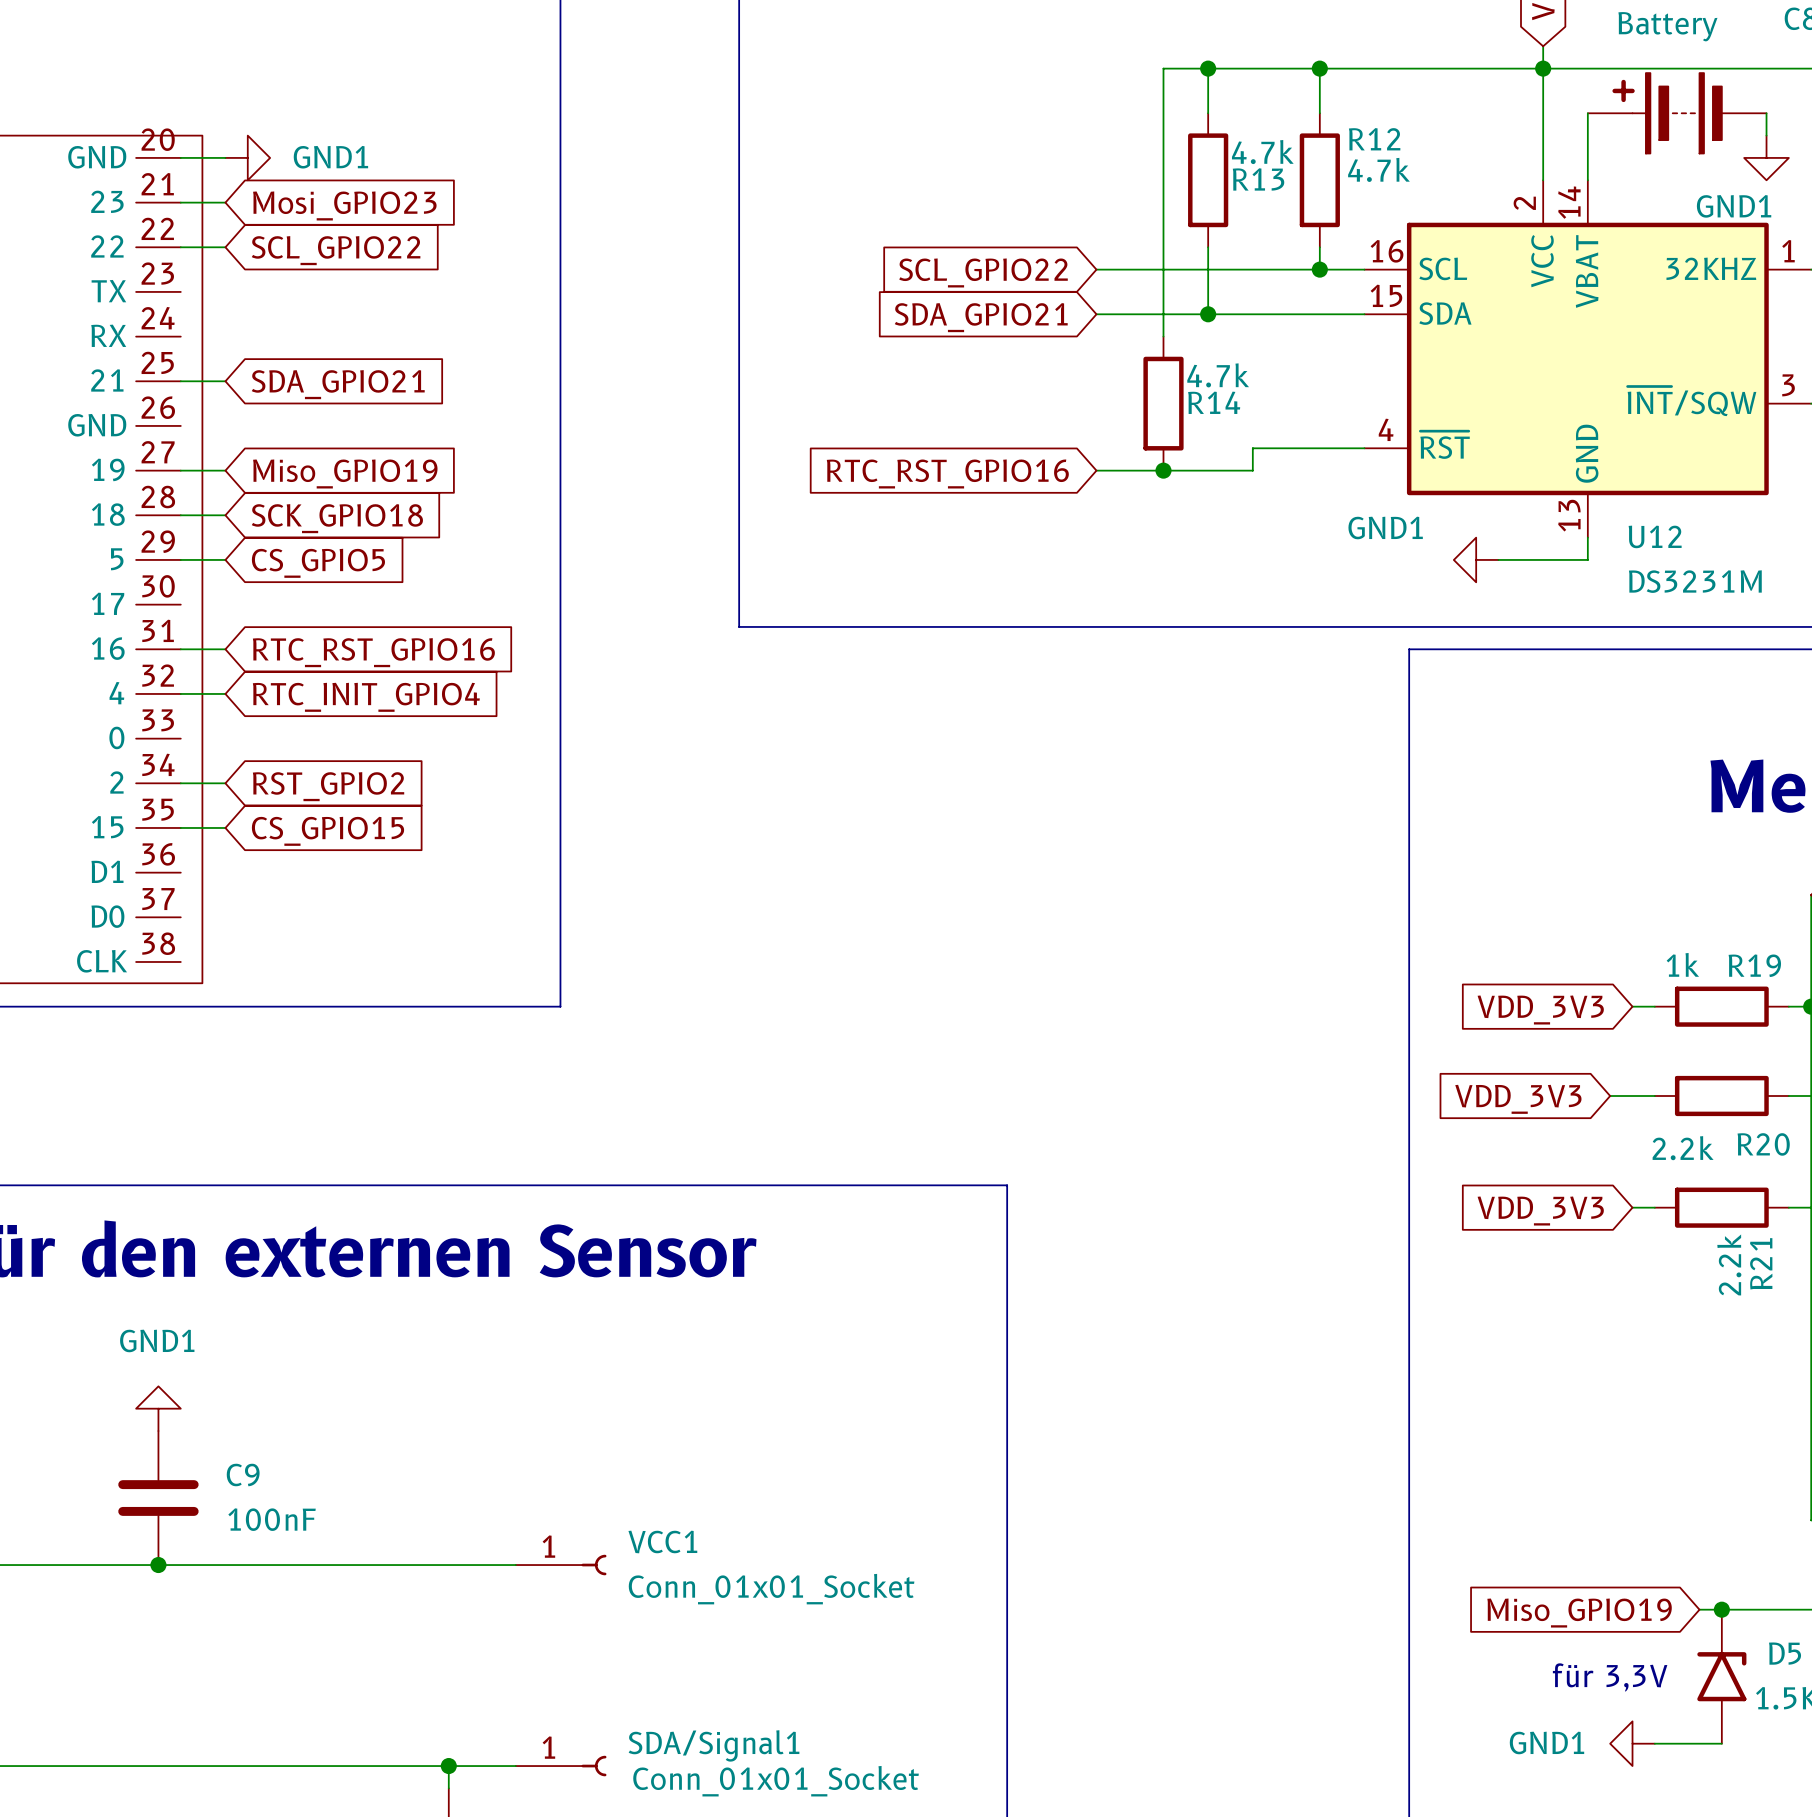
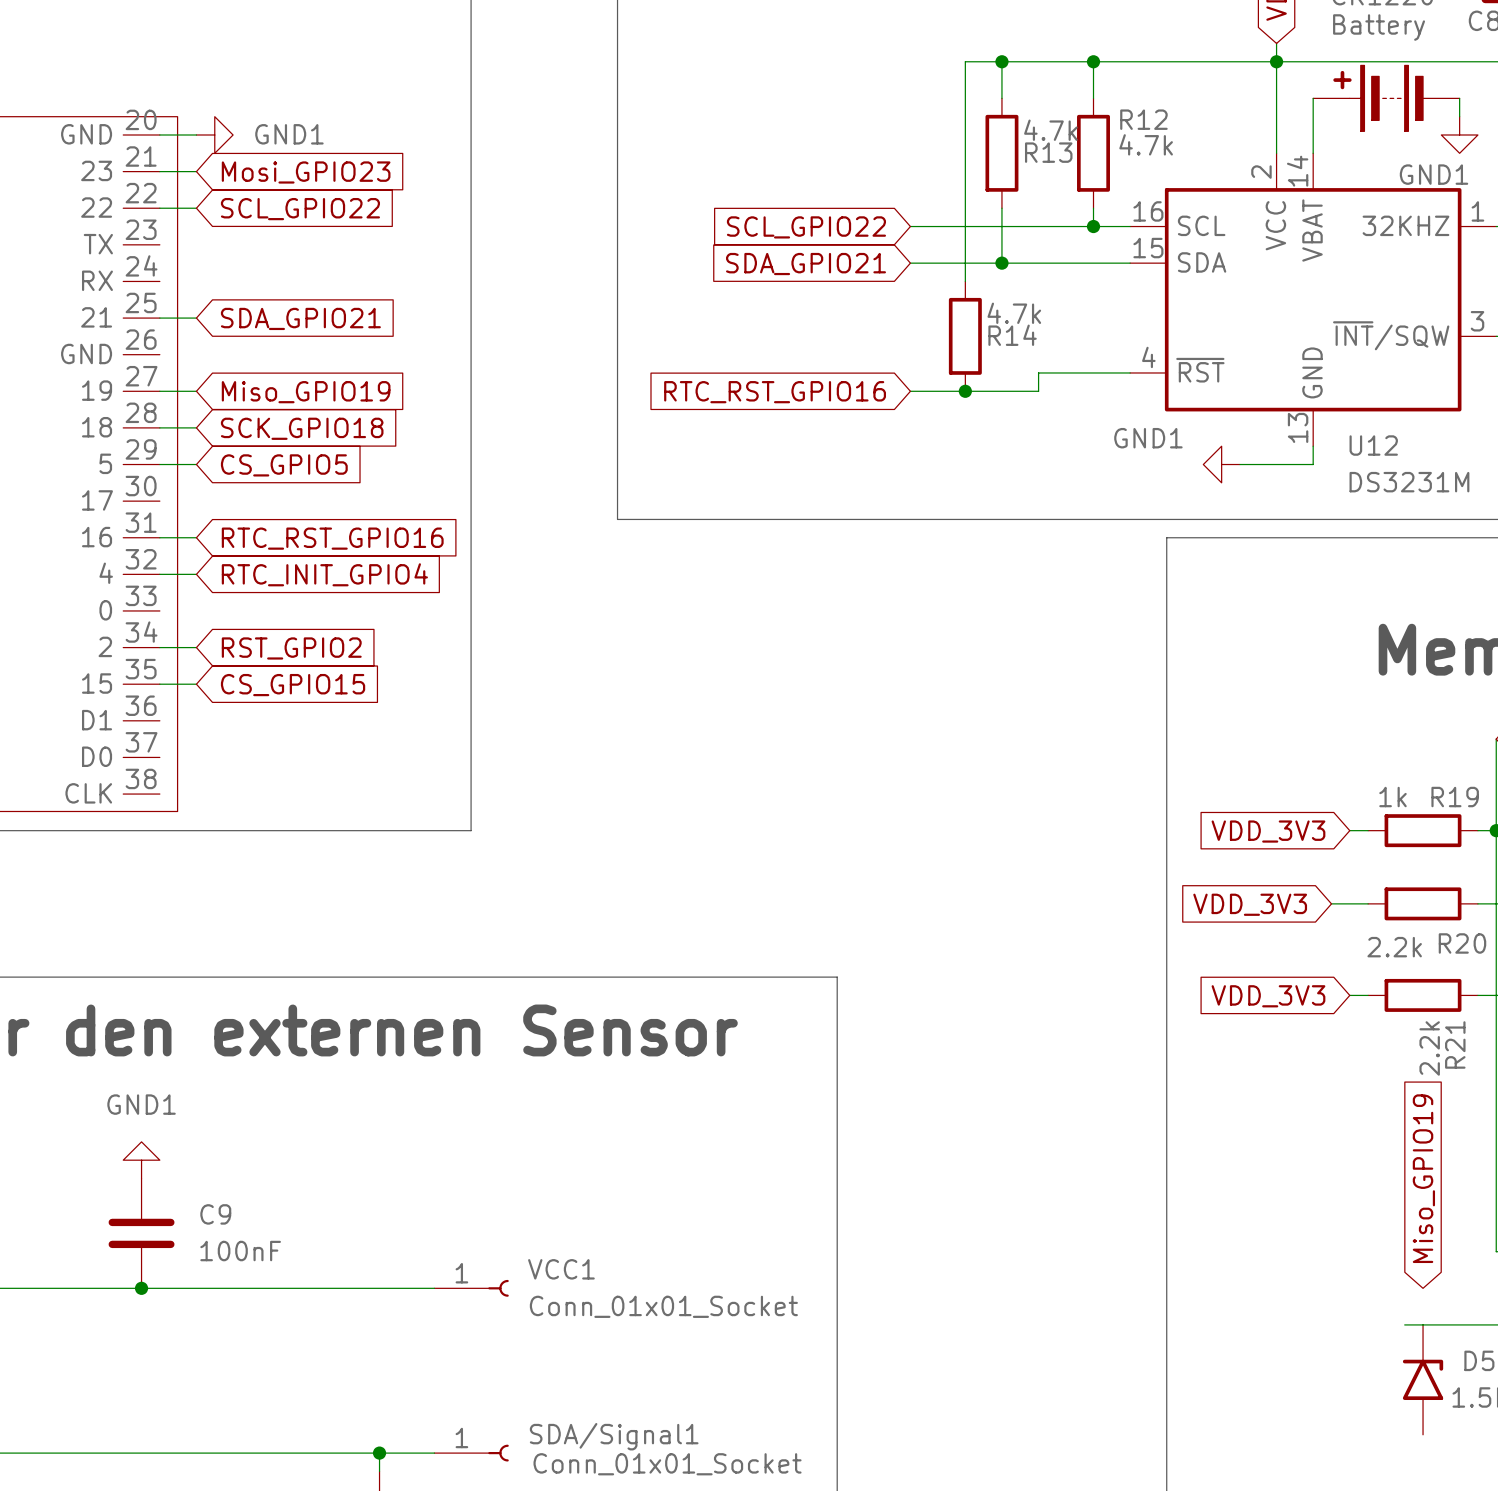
junction: (1721, 1609) -> none
global label rotation: 0° (1579, 1613) -> 90° clockwise (1423, 1178)
text: für 3,3V (1610, 1677) -> none
power symbol: GND1 (1632, 1743) -> none
wire: (1654, 1743) (1721, 1743) -> none

